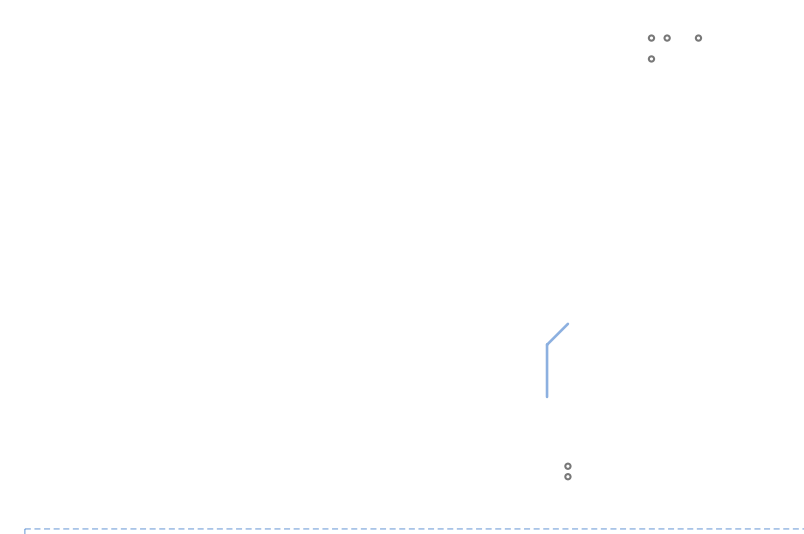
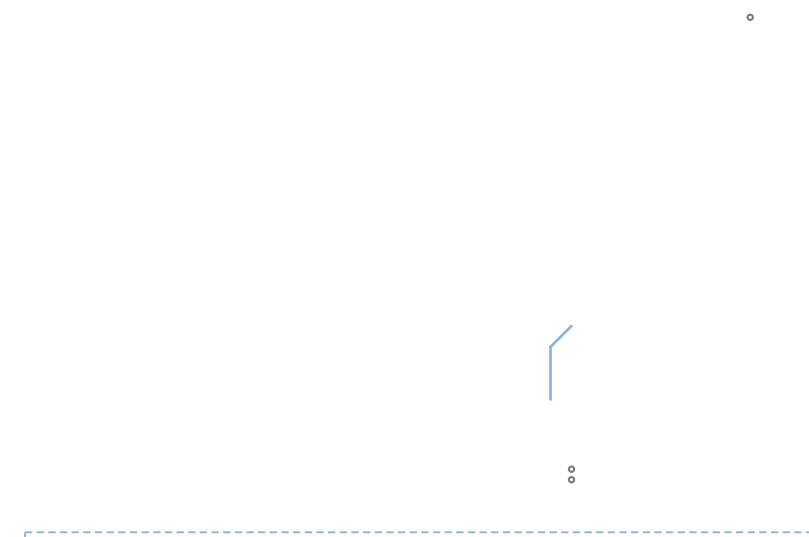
via: none -> (750, 17)
via: (651, 38) -> none
via: (667, 38) -> none
via: (698, 38) -> none
via: (651, 58) -> none

